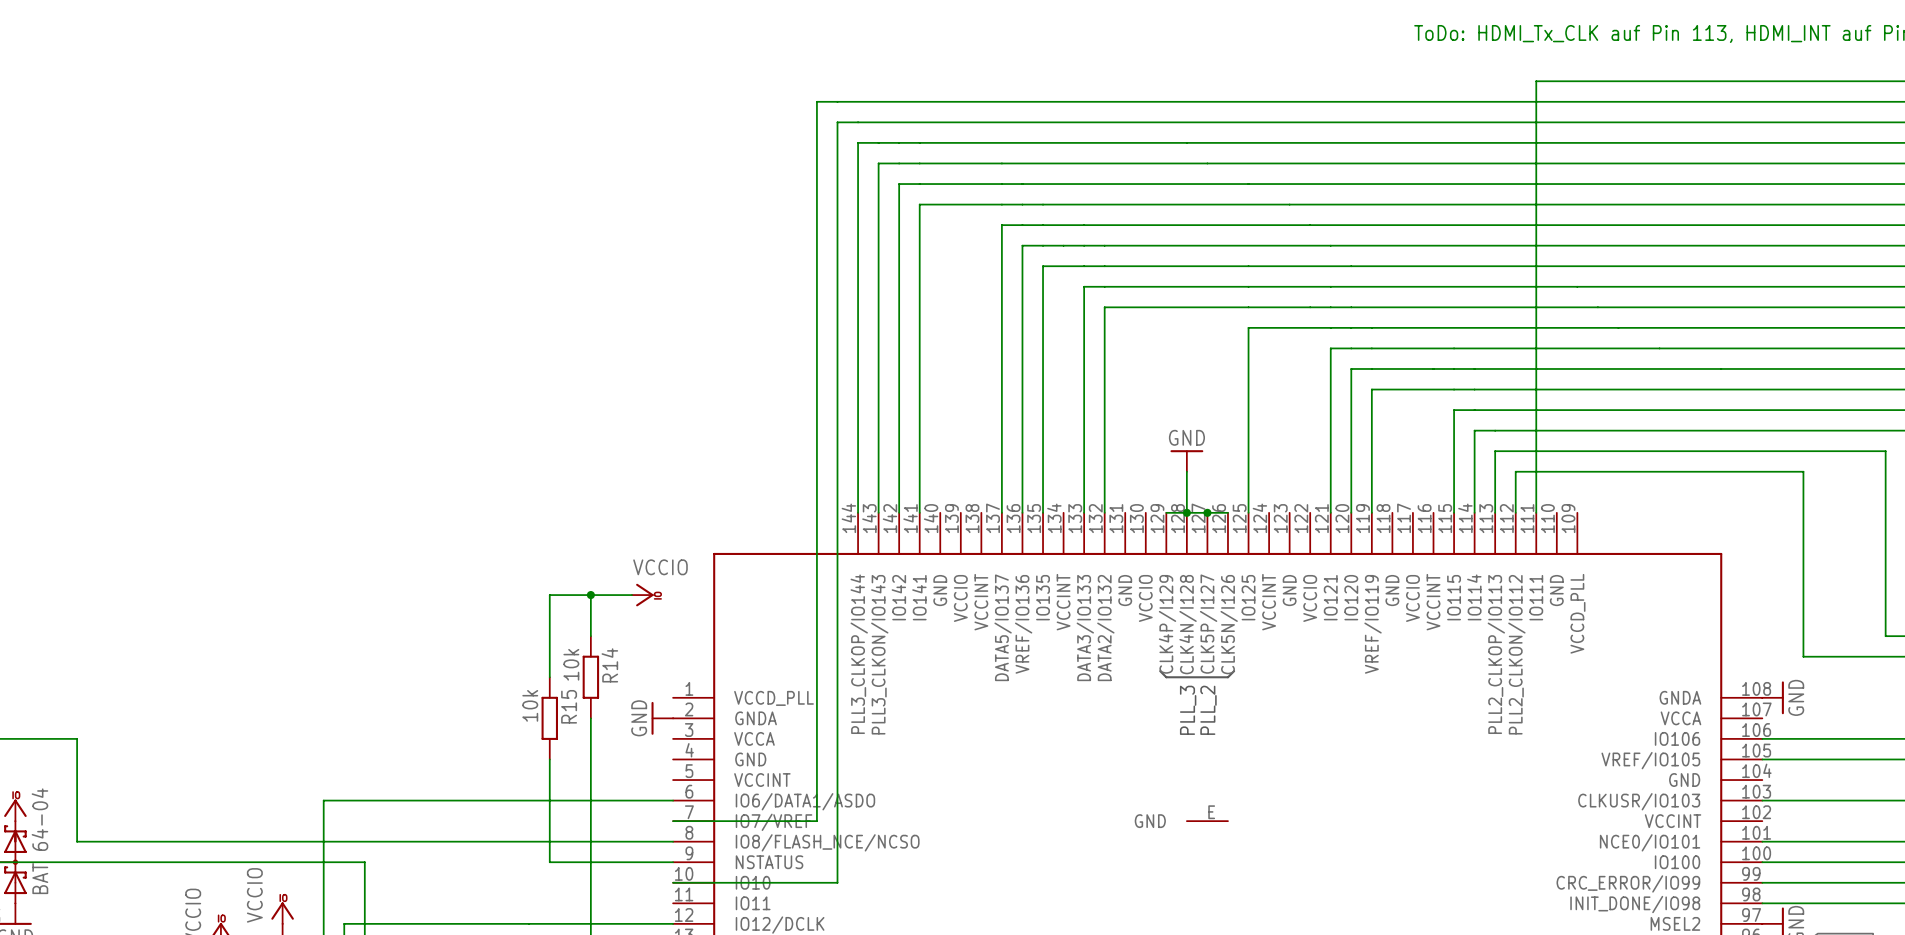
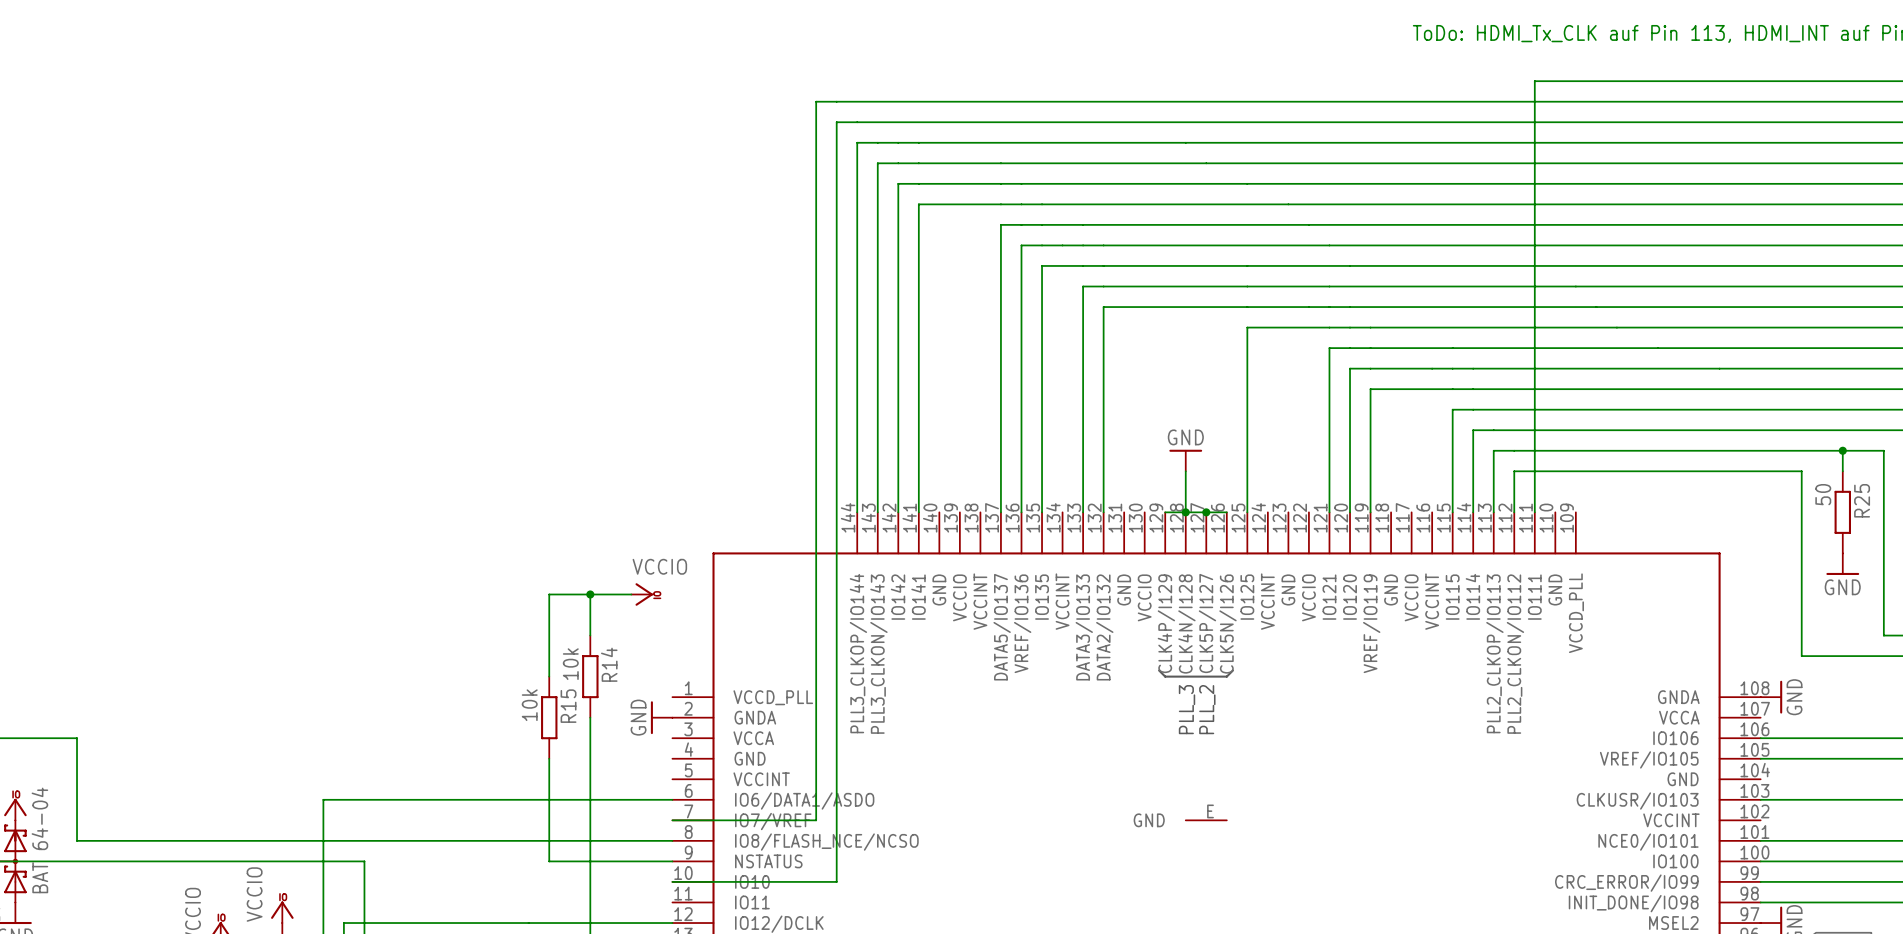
wire: none -> (1842, 450) (1842, 471)
junction: none -> (1842, 450)
R25: none -> 50 (1842, 512)
power symbol: none -> GND (1842, 564)

